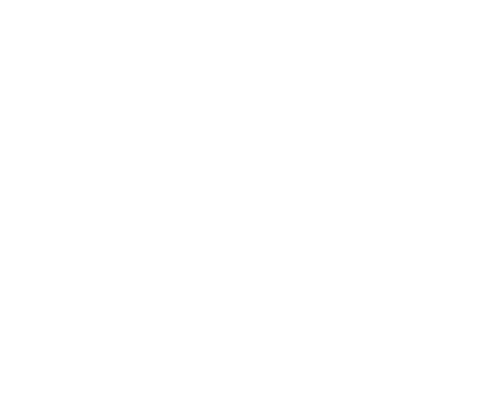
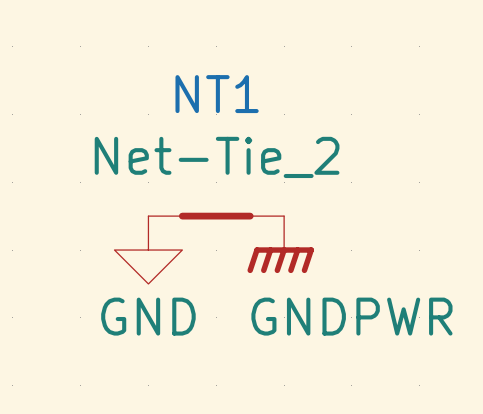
NT1: none -> Net-Tie_2 (216, 216)
power symbol: none -> GNDPWR (280, 244)
power symbol: none -> GND (148, 250)

